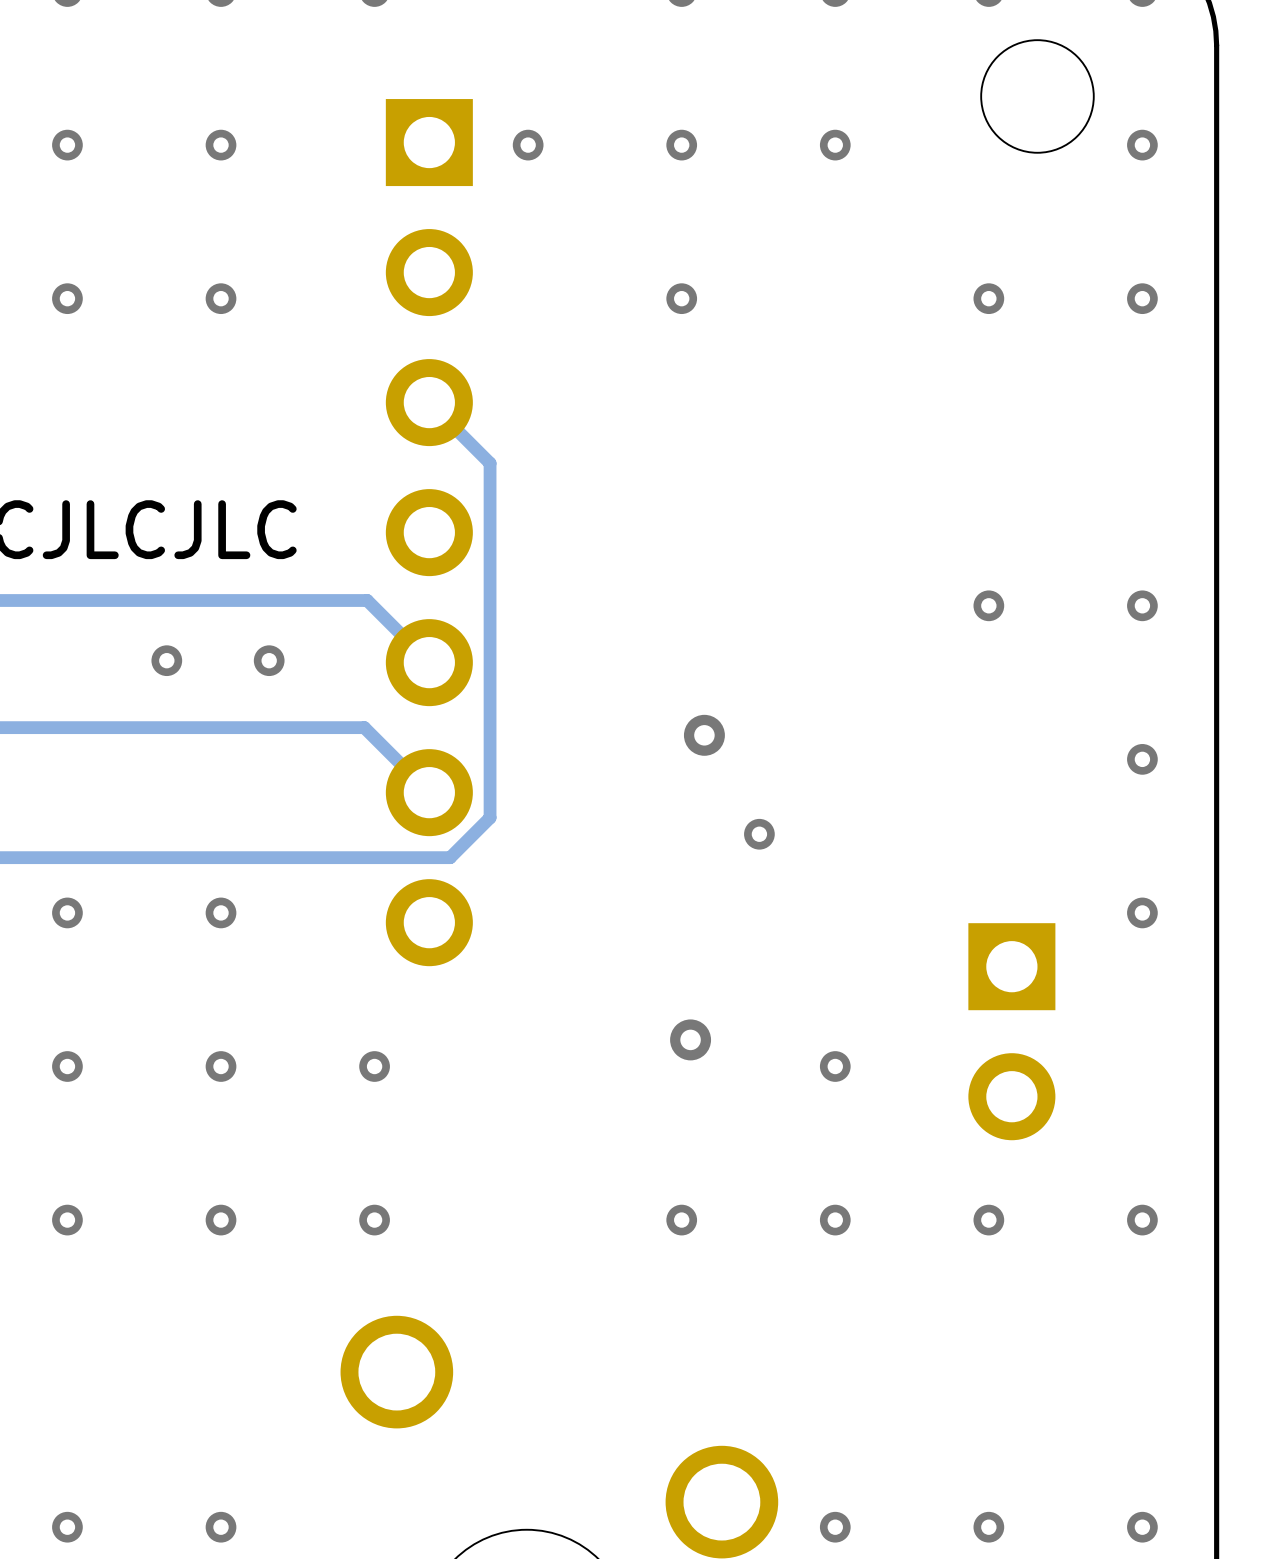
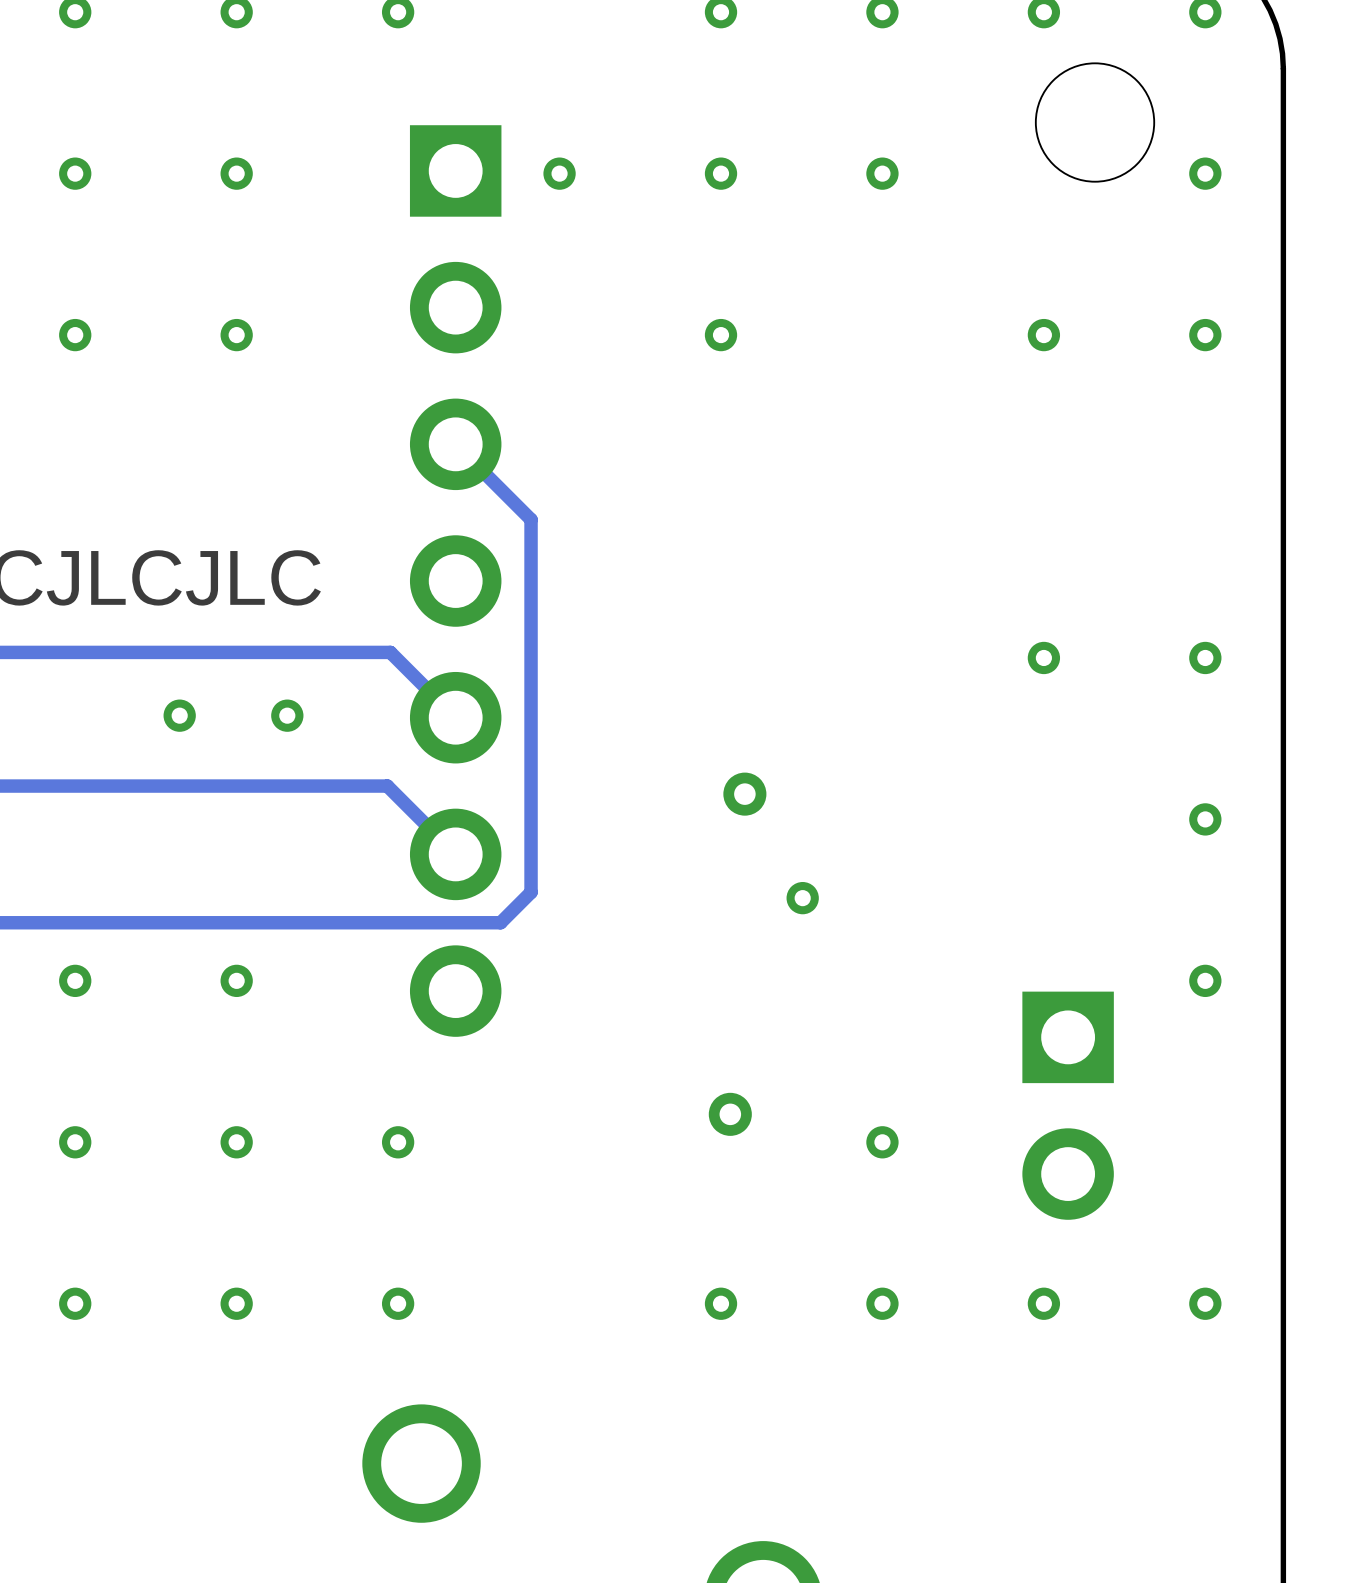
track: (490, 463) (490, 817) (450, 857) -> (519, 508) (531, 519) (531, 892) (500, 922) (477, 922)

